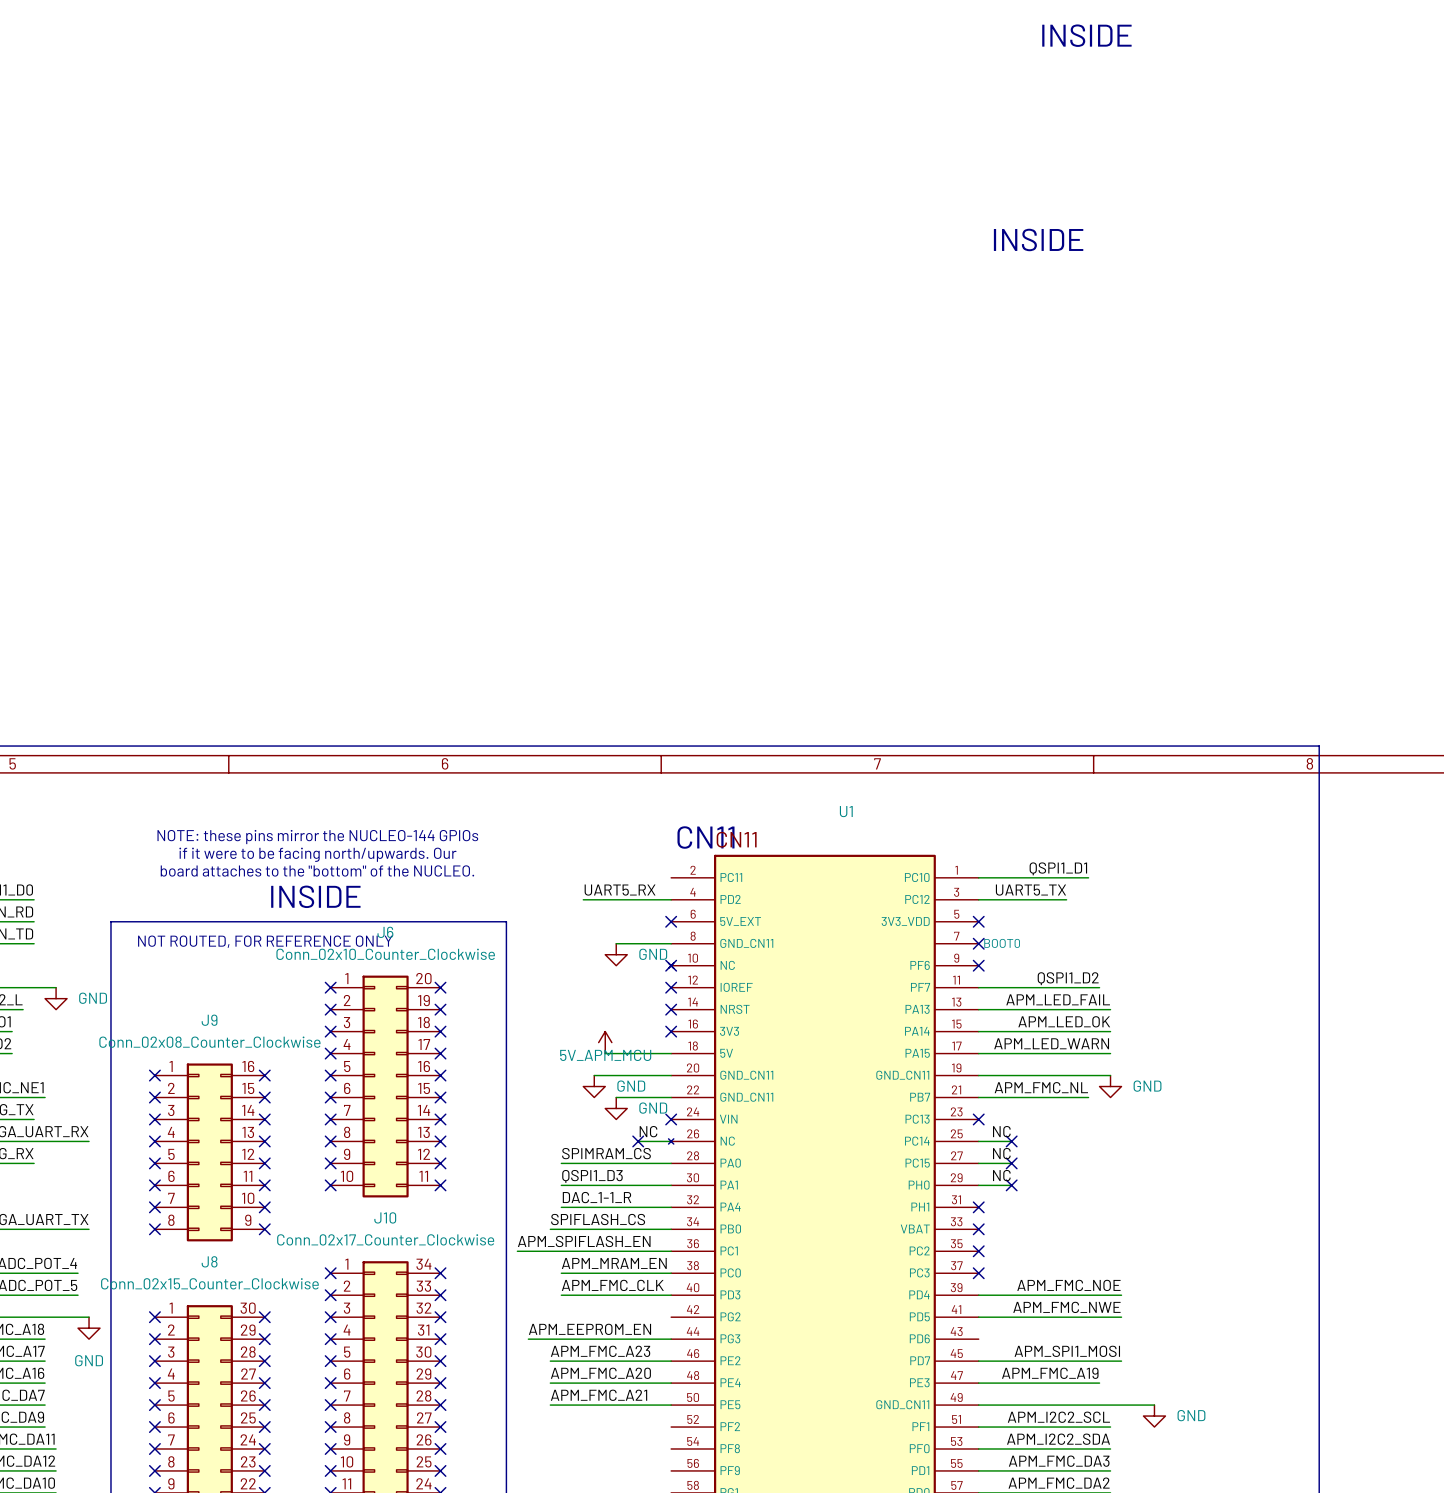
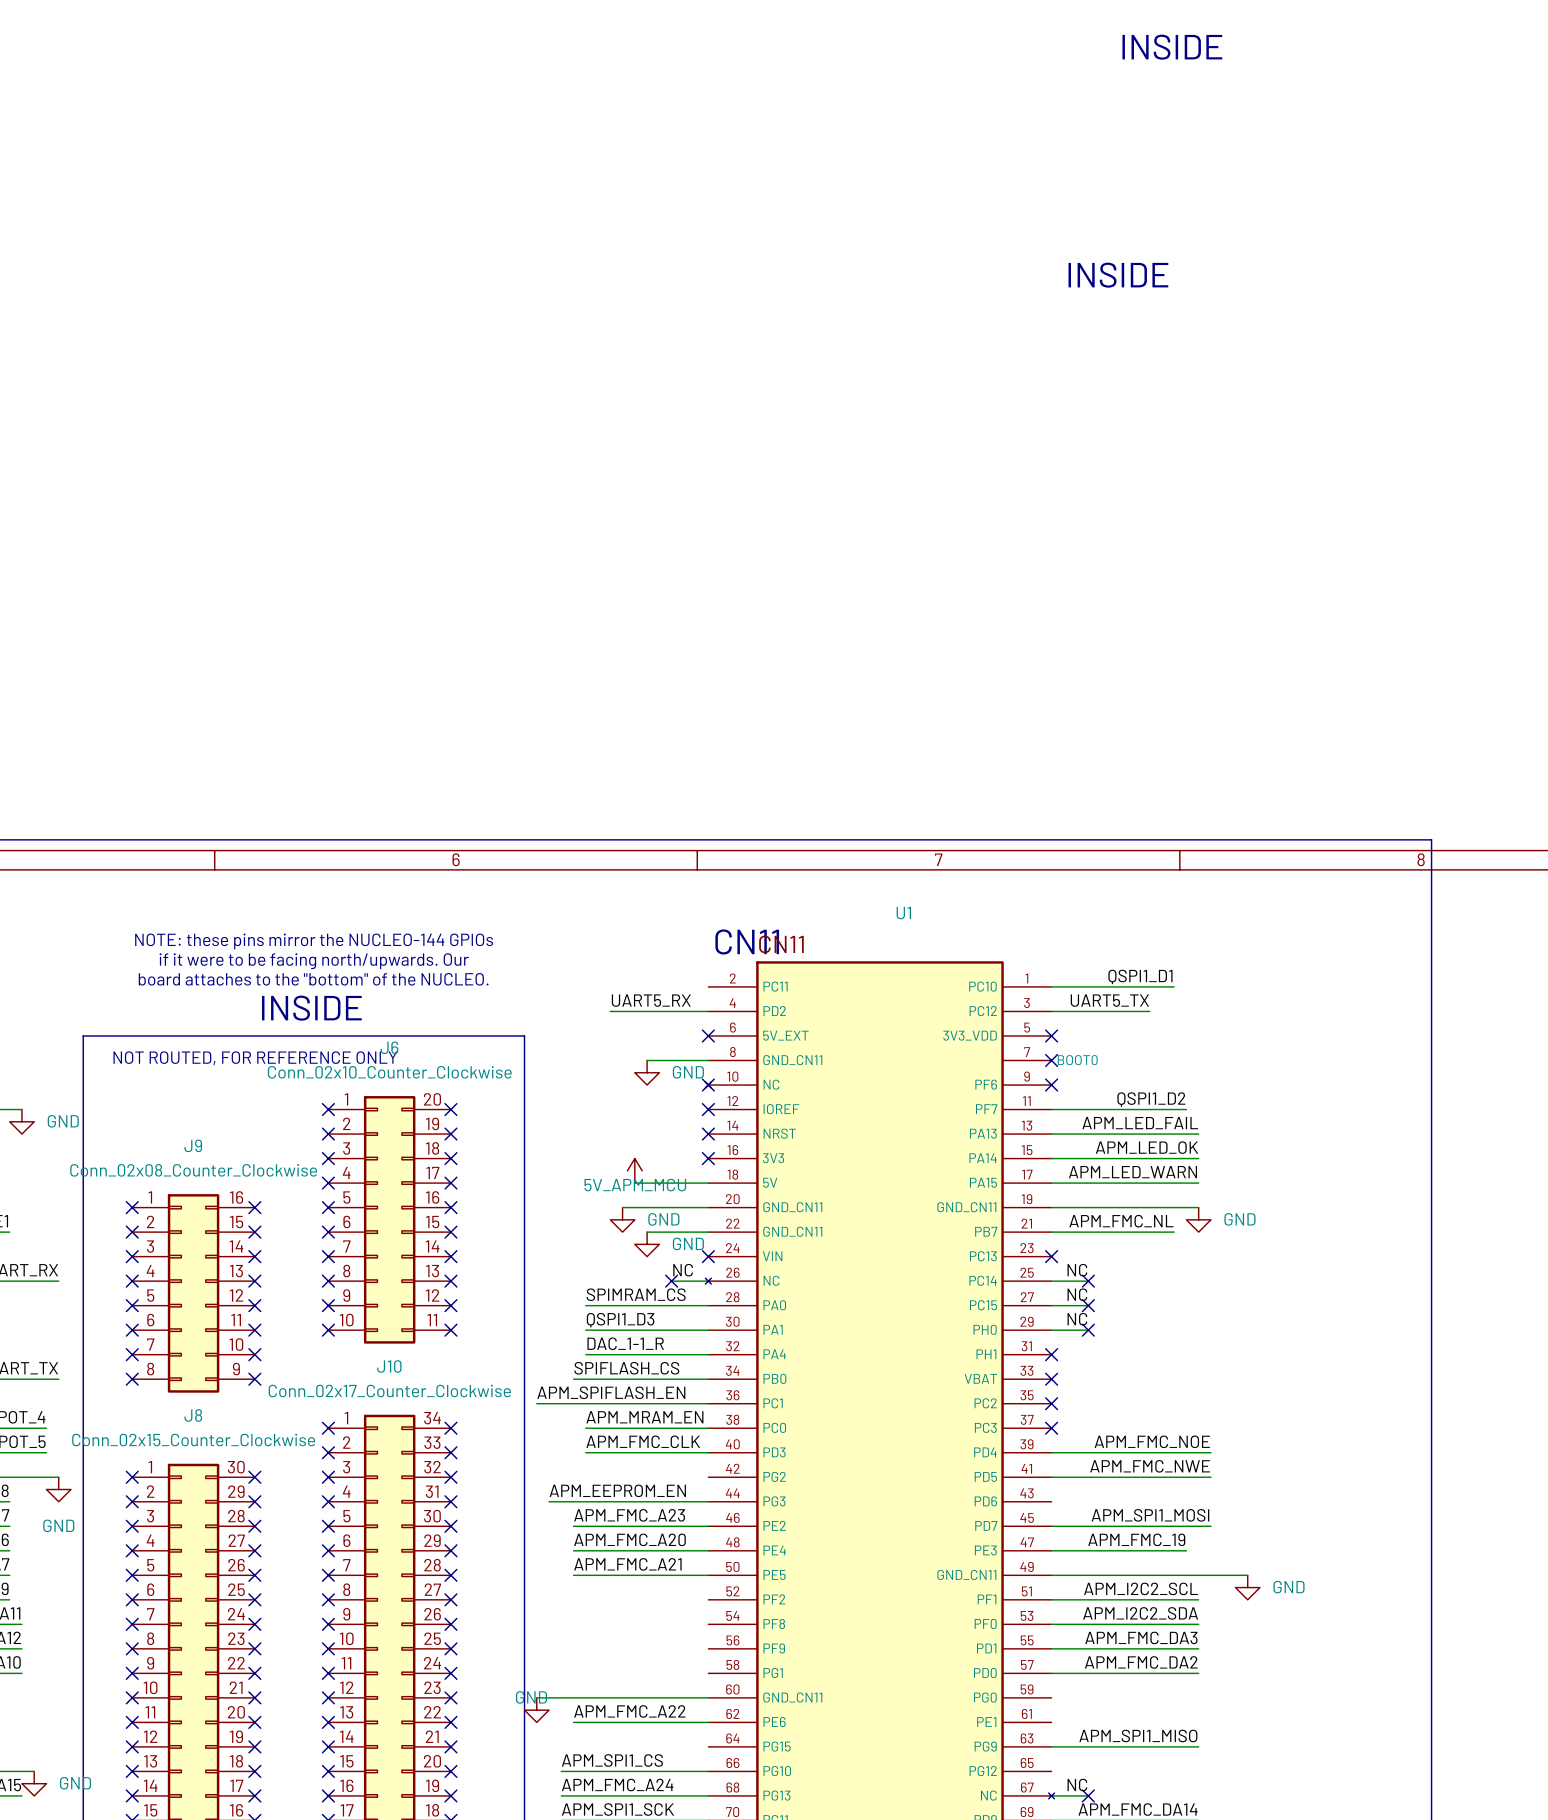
label: APM_FMC_A19 (1050, 1373) -> APM_FMC_19 (1136, 1539)

